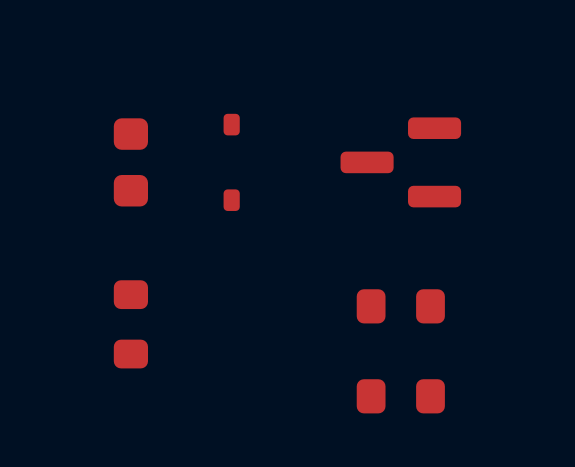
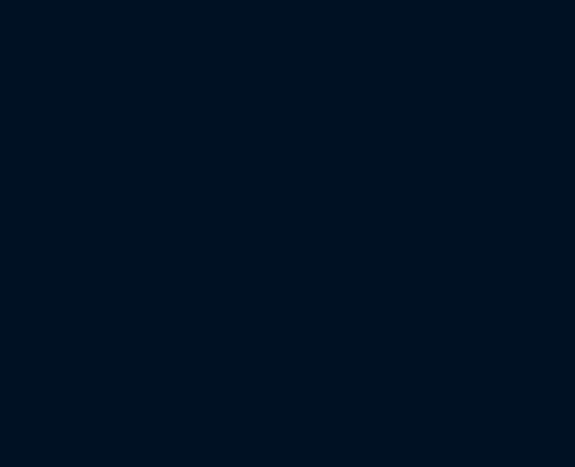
part: (130, 162) -> none
part: (231, 162) -> none
part: (400, 162) -> none
part: (400, 306) -> none
part: (130, 324) -> none
part: (400, 396) -> none

